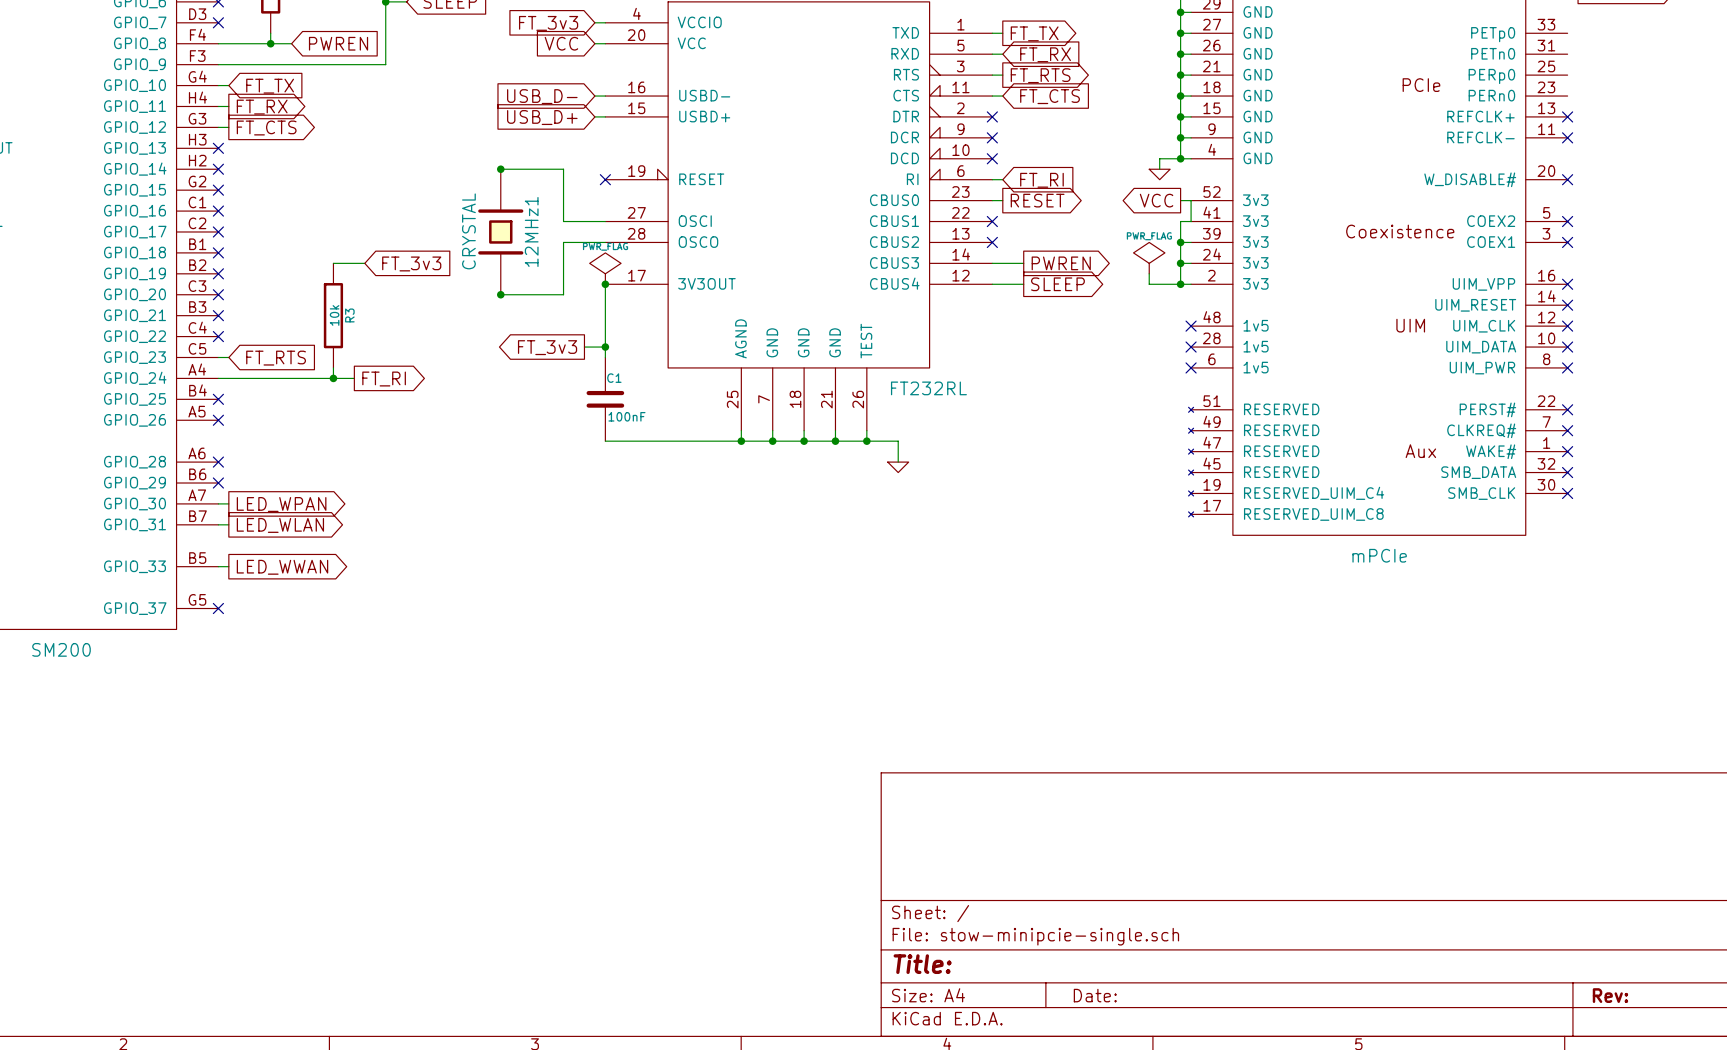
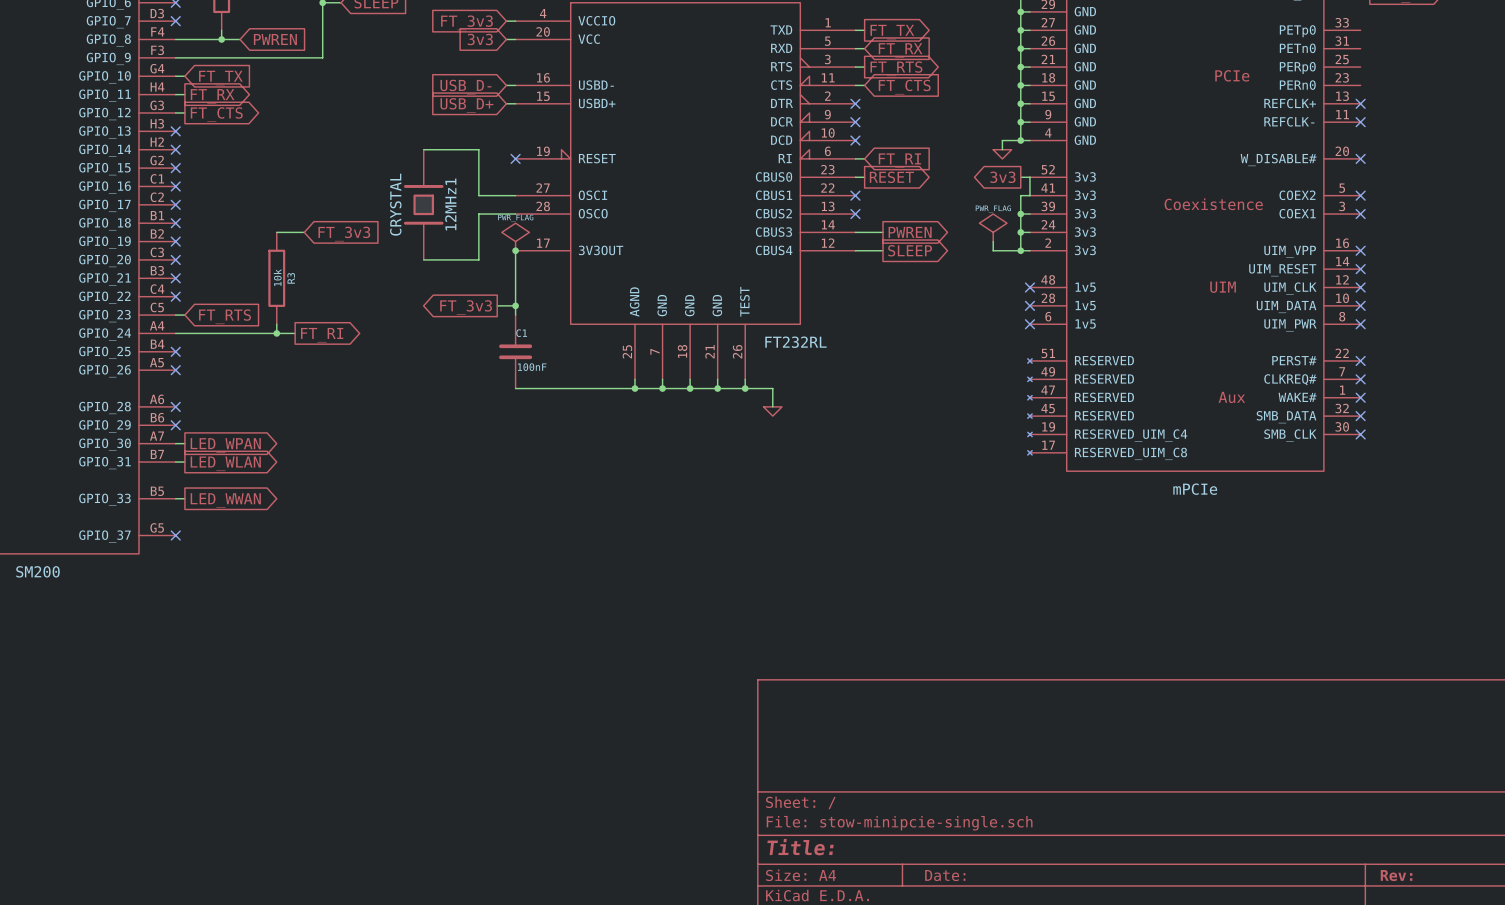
global label: VCC (561, 43) -> 3v3 (480, 39)
junction: (500, 169) -> none
global label: VCC (1156, 200) -> 3v3 (1002, 177)
junction: (500, 294) -> none

